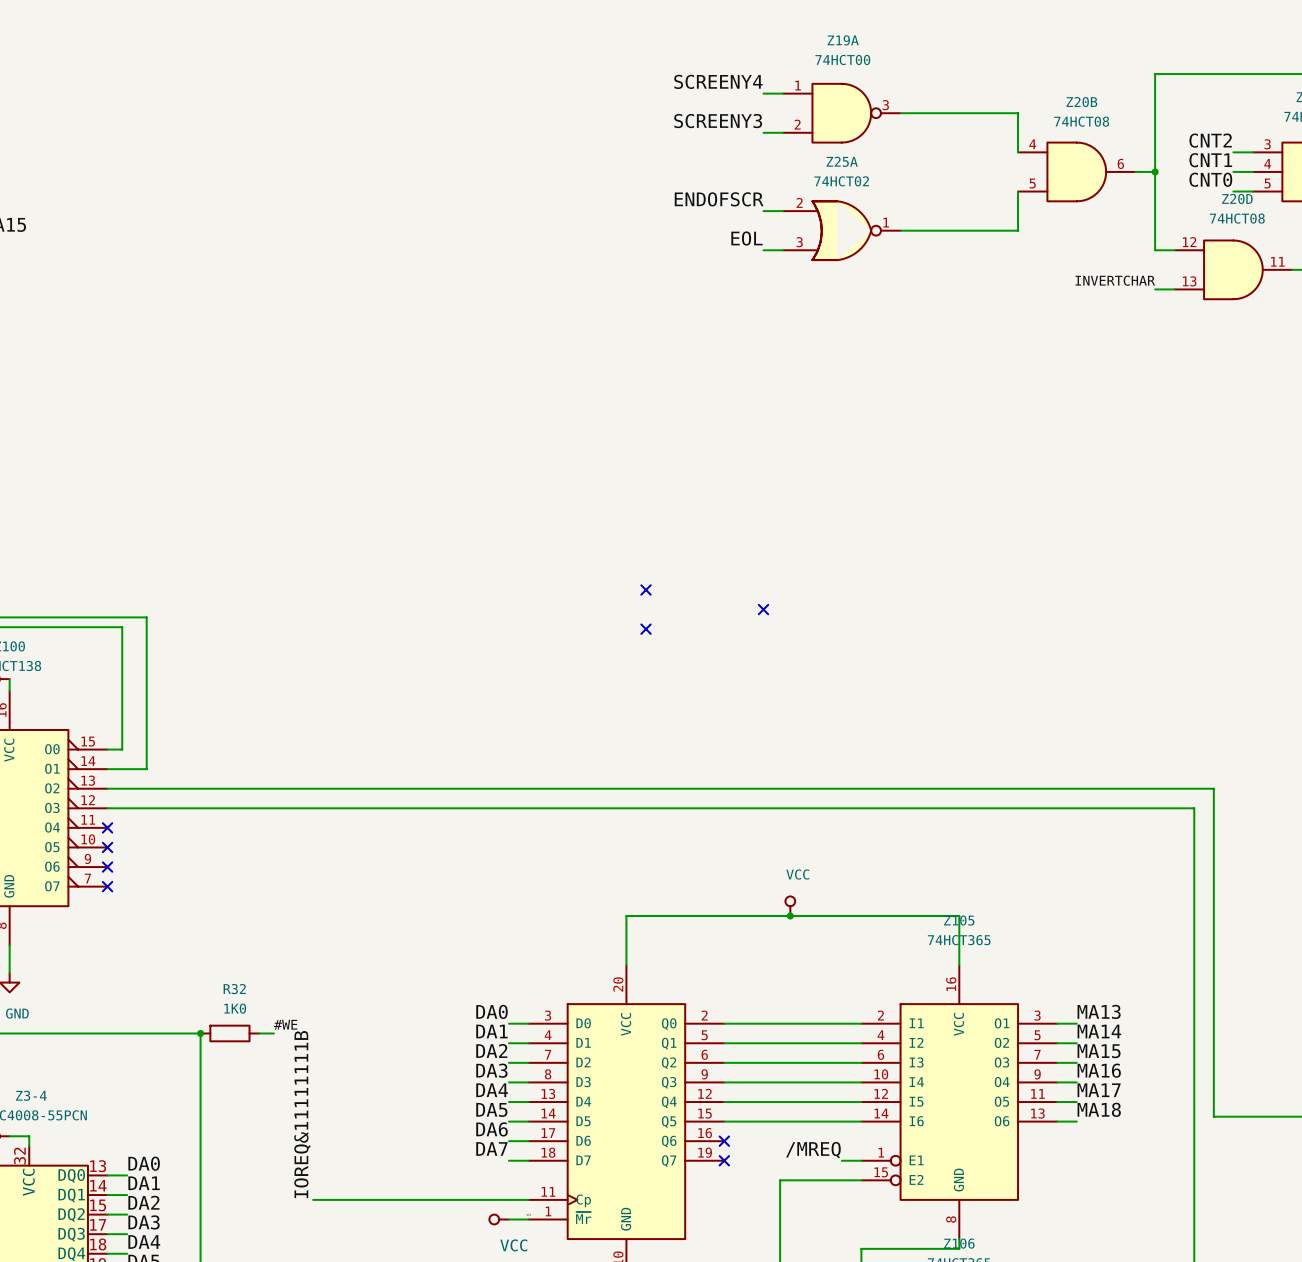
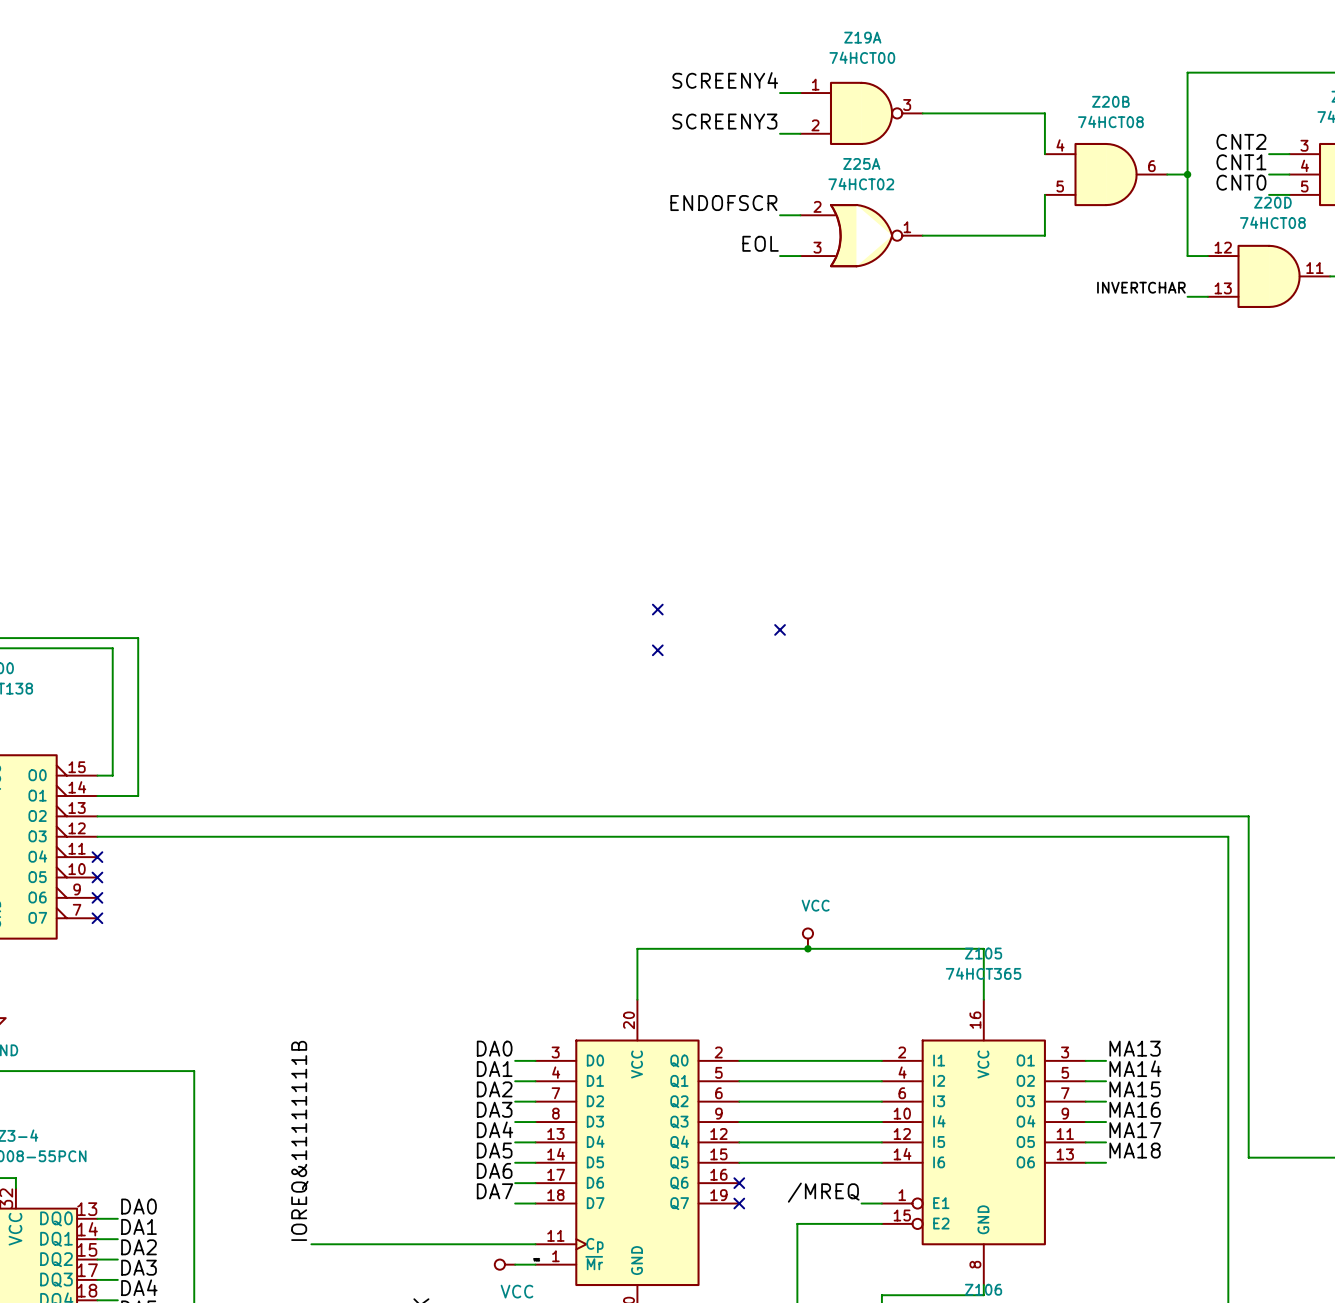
label: #WE (285, 1024) -> none
junction: (200, 1033) -> none
R32: 1K0 (229, 1033) -> none
wire: (259, 1033) (273, 1033) -> none

